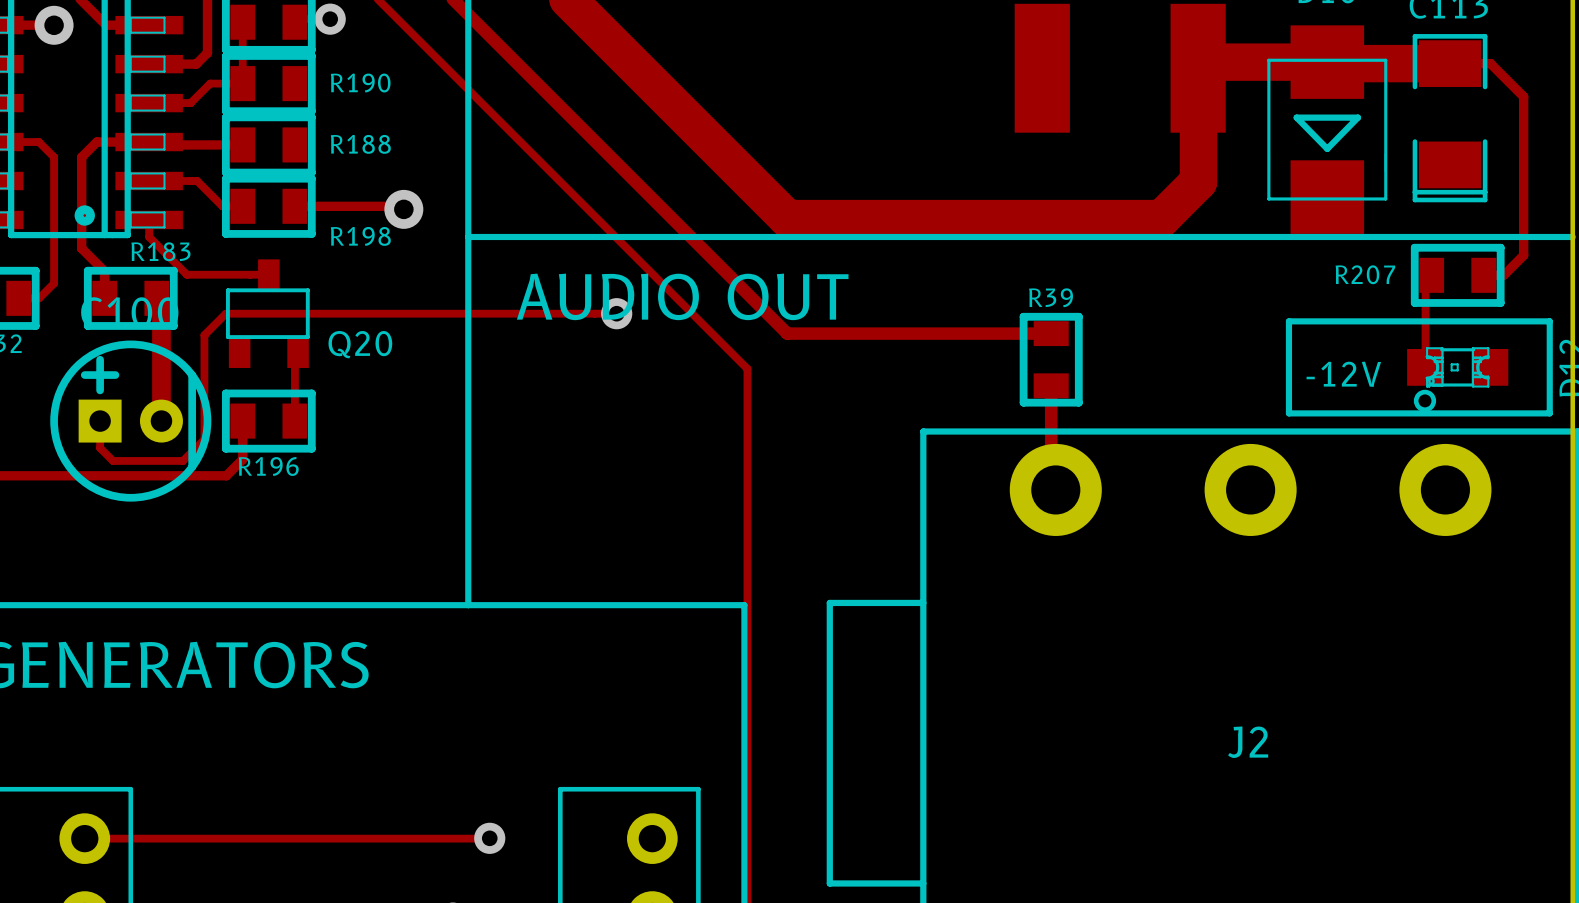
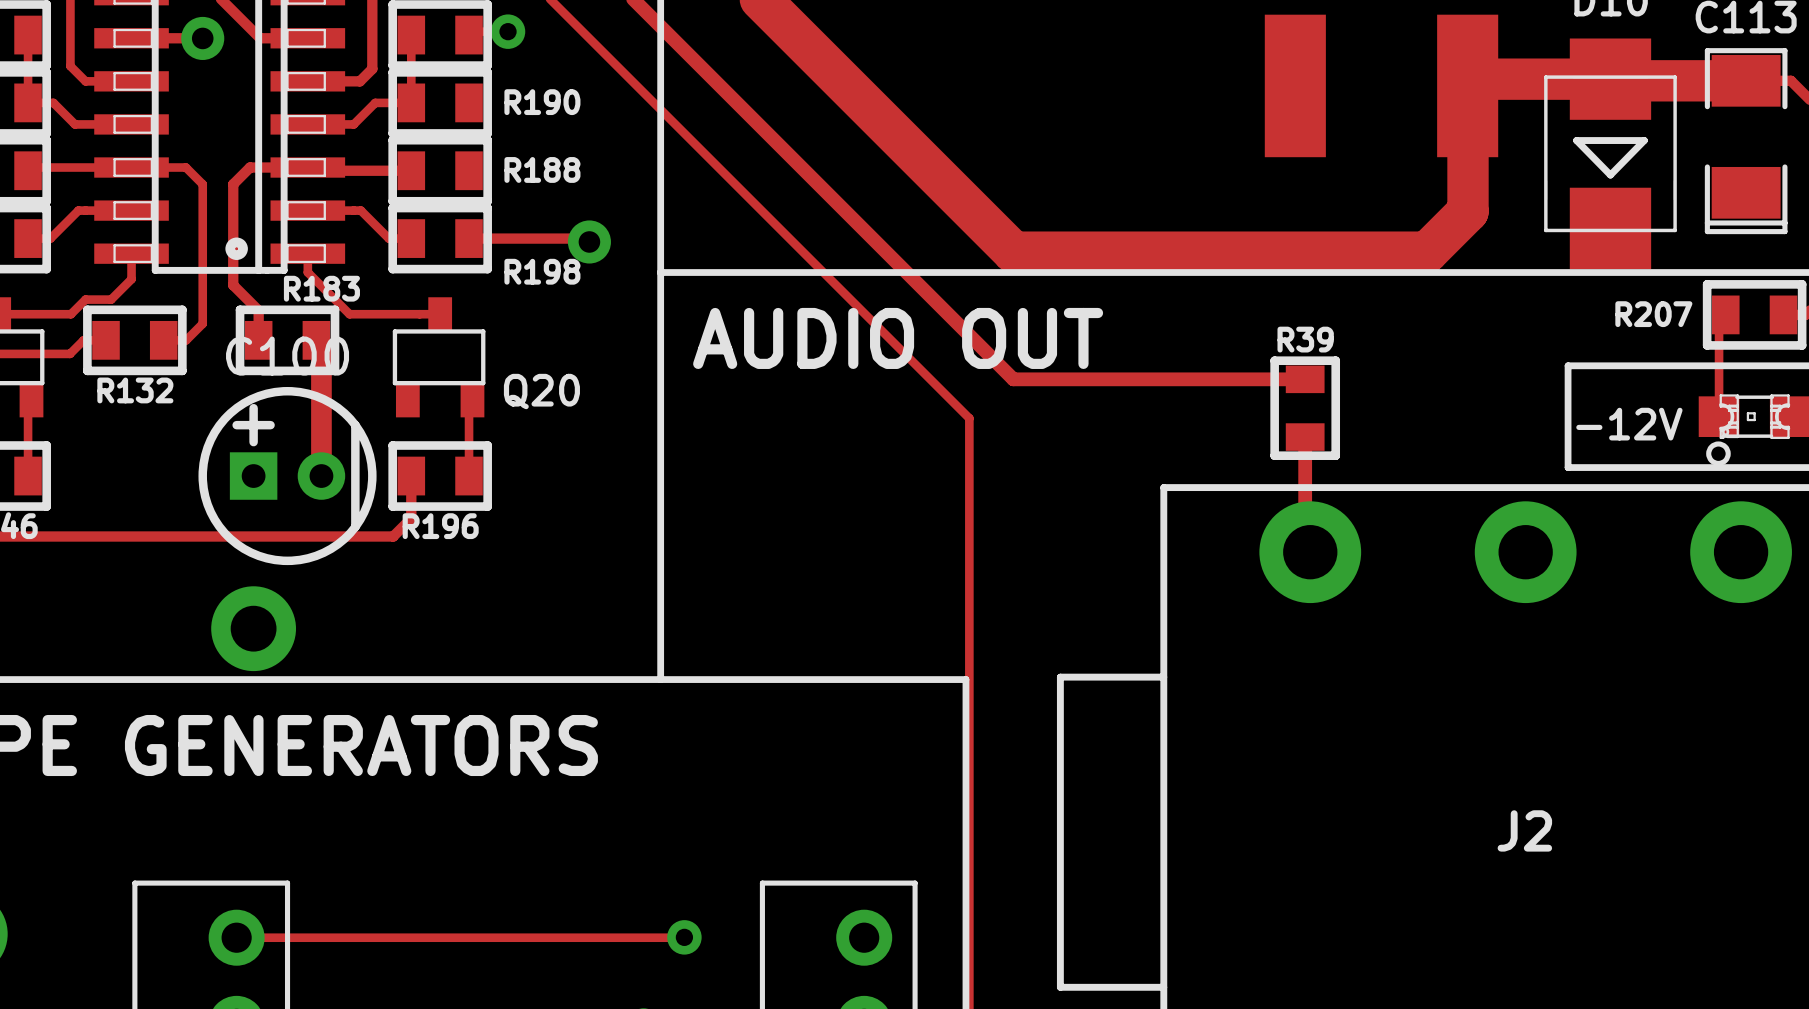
track: (616, 313) (225, 313) (204, 335) (204, 439) (182, 460) (113, 460) (100, 448) (100, 421) -> none
via: (616, 313) -> none
part: none -> (253, 628)

